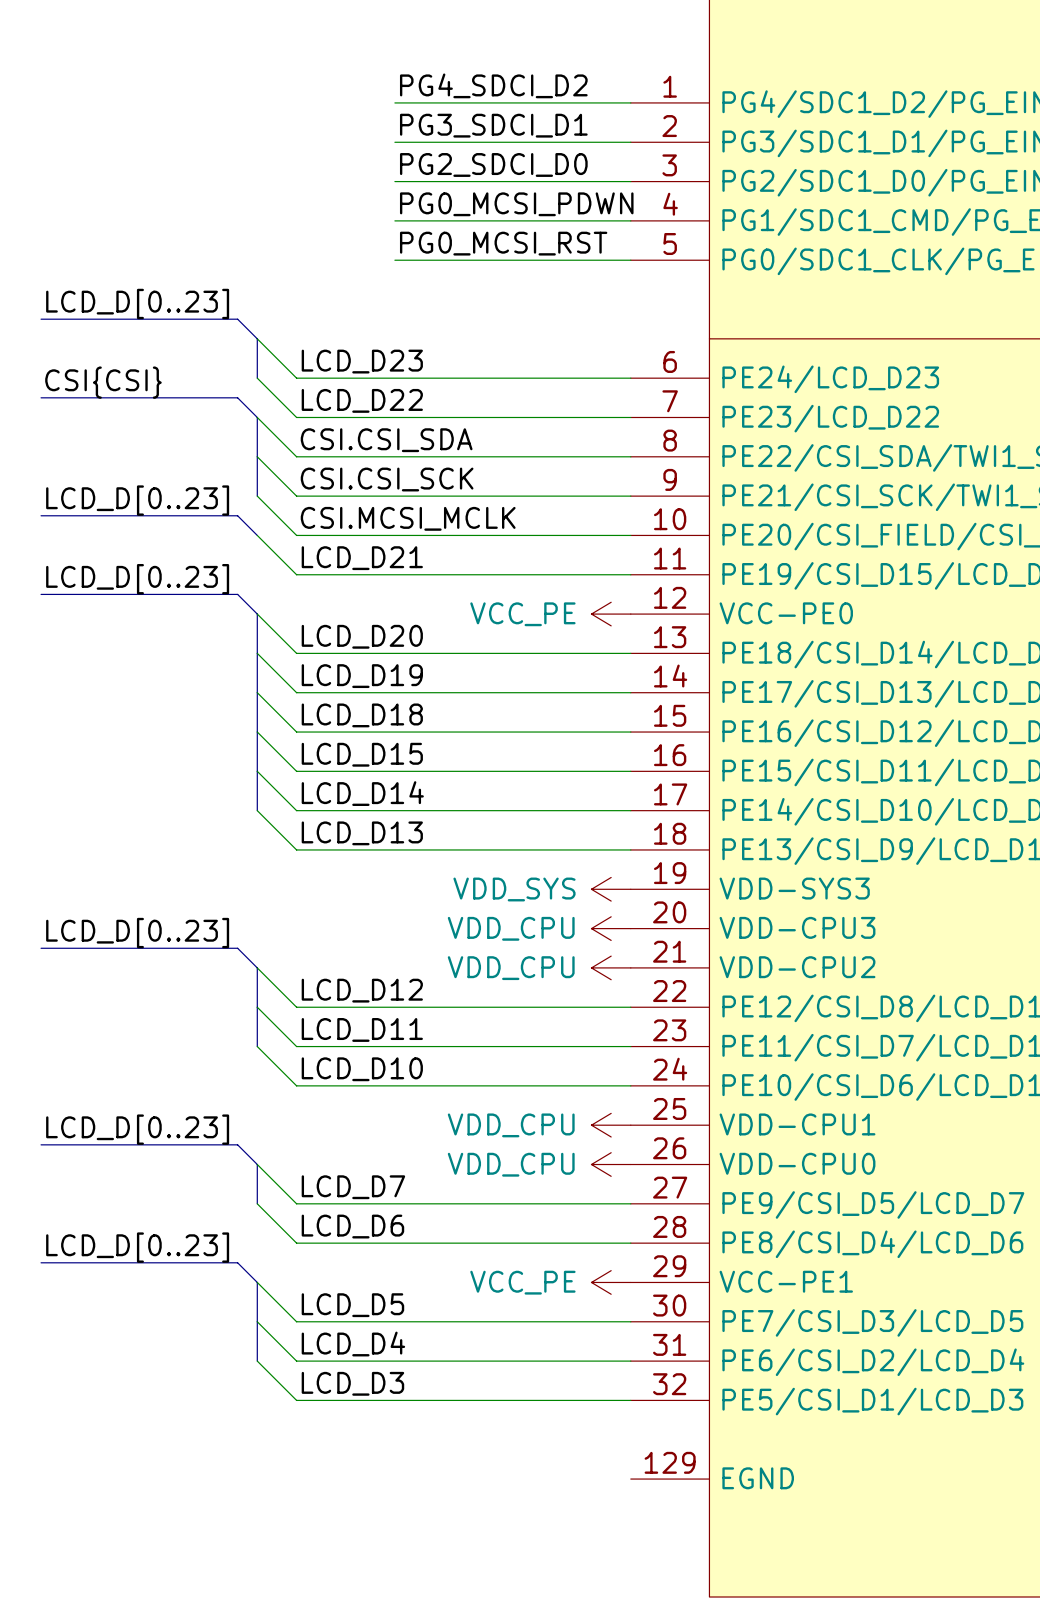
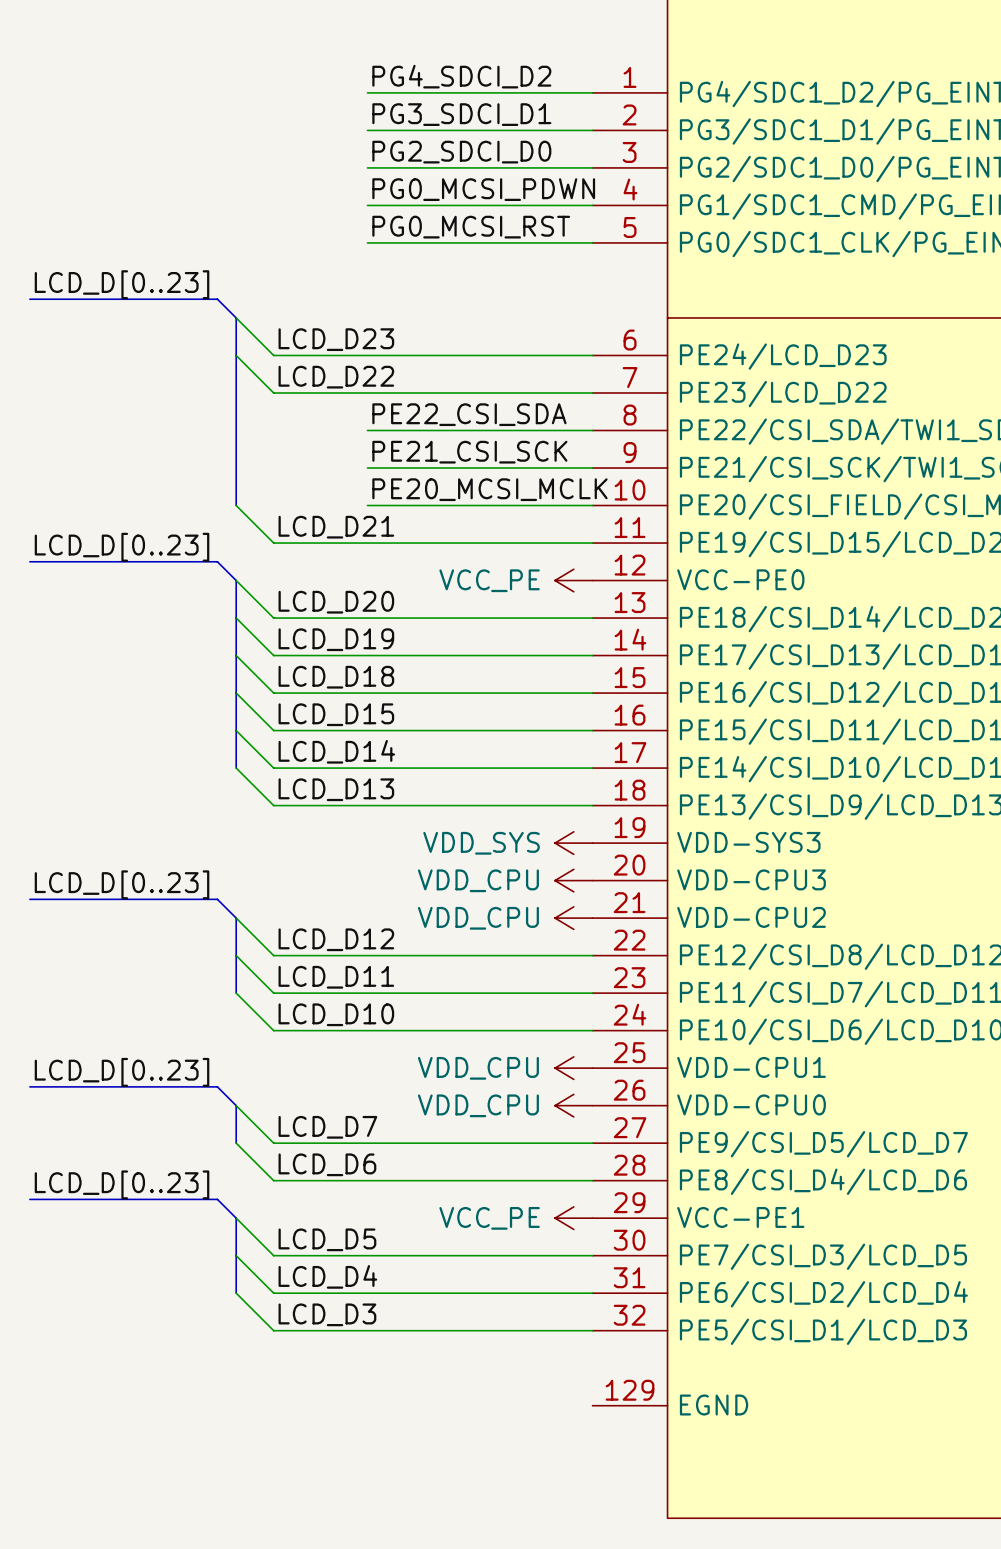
label: CSI{CSI} (103, 382) -> none
bus: (41, 397) (237, 397) (257, 417) -> (236, 355) (236, 392)
wire: (257, 417) (296, 456) (394, 456) -> none
label: CSI.CSI_SDA (386, 440) -> PE22_CSI_SDA (469, 414)
wire: (257, 456) (296, 496) (394, 496) -> none
label: CSI.CSI_SCK (387, 479) -> PE21_CSI_SCK (469, 452)
wire: (257, 496) (296, 535) (394, 535) -> none
label: LCD_D[0..23] (137, 500) -> none
bus: (41, 515) (237, 515) (257, 535) -> (236, 468) (236, 505)
label: CSI.MCSI_MCLK (408, 518) -> PE20_MCSI_MCLK (489, 489)

